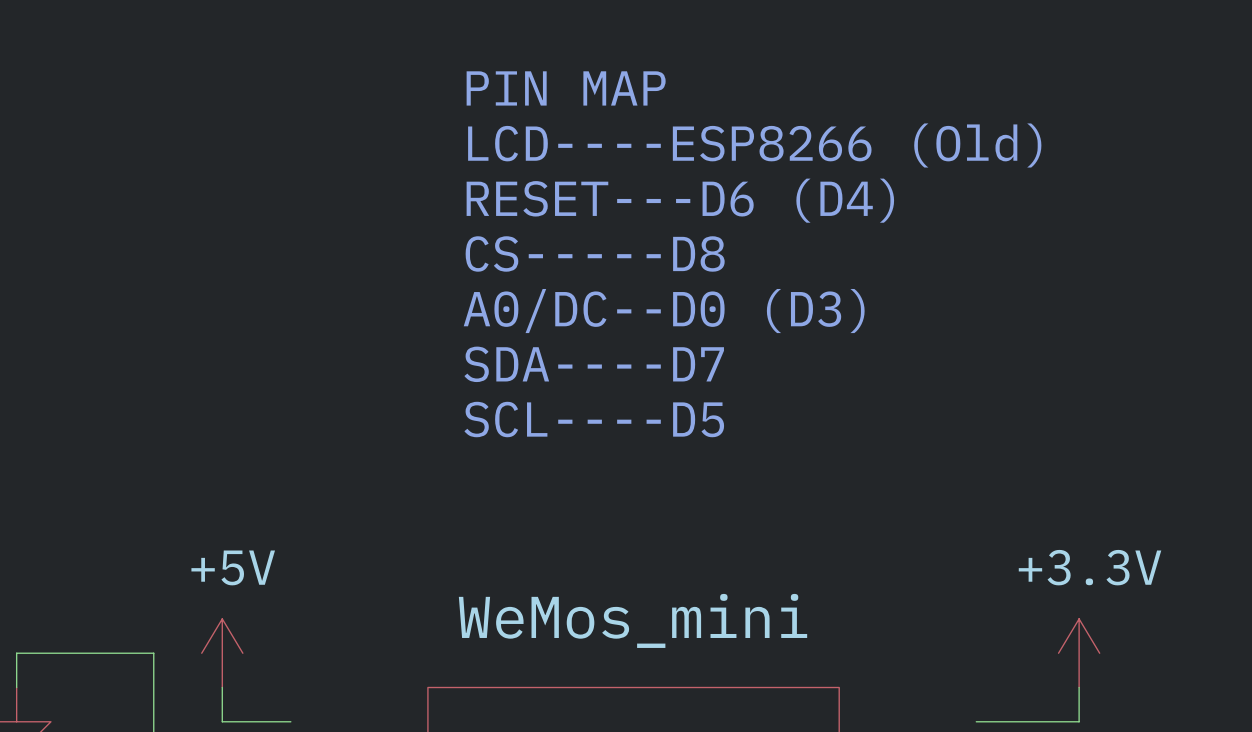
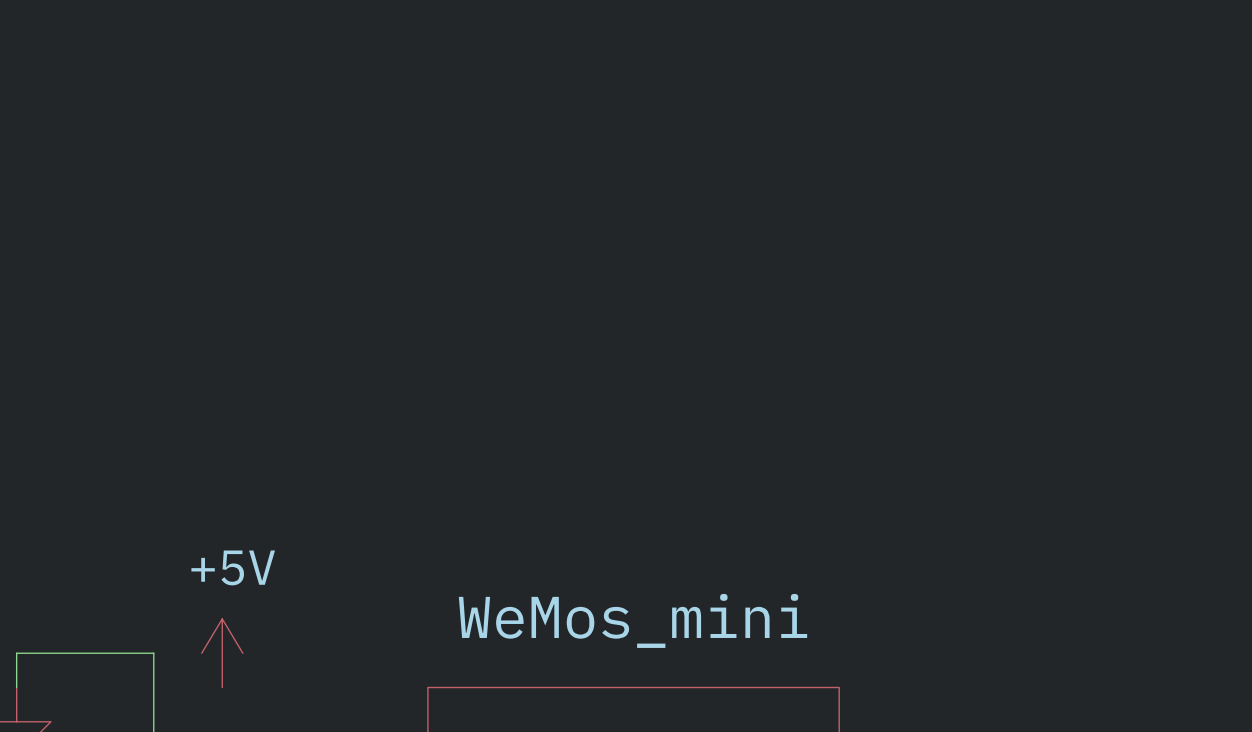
text: PIN MAP (566, 88) -> none
text: LCD----ESP8266 (Old) (754, 145) -> none
text: RESET---D6 (D4) (680, 200) -> none
text: CS-----D8 (595, 253) -> none
text: A0/DC--D0 (D3) (664, 311) -> none
text: SDA----D7 (594, 364) -> none
text: SCL----D5 (594, 419) -> none
power symbol: +3.3V (1079, 653) -> none
wire: (222, 687) (222, 721) (290, 721) -> none
wire: (1079, 687) (1079, 721) (976, 721) -> none

